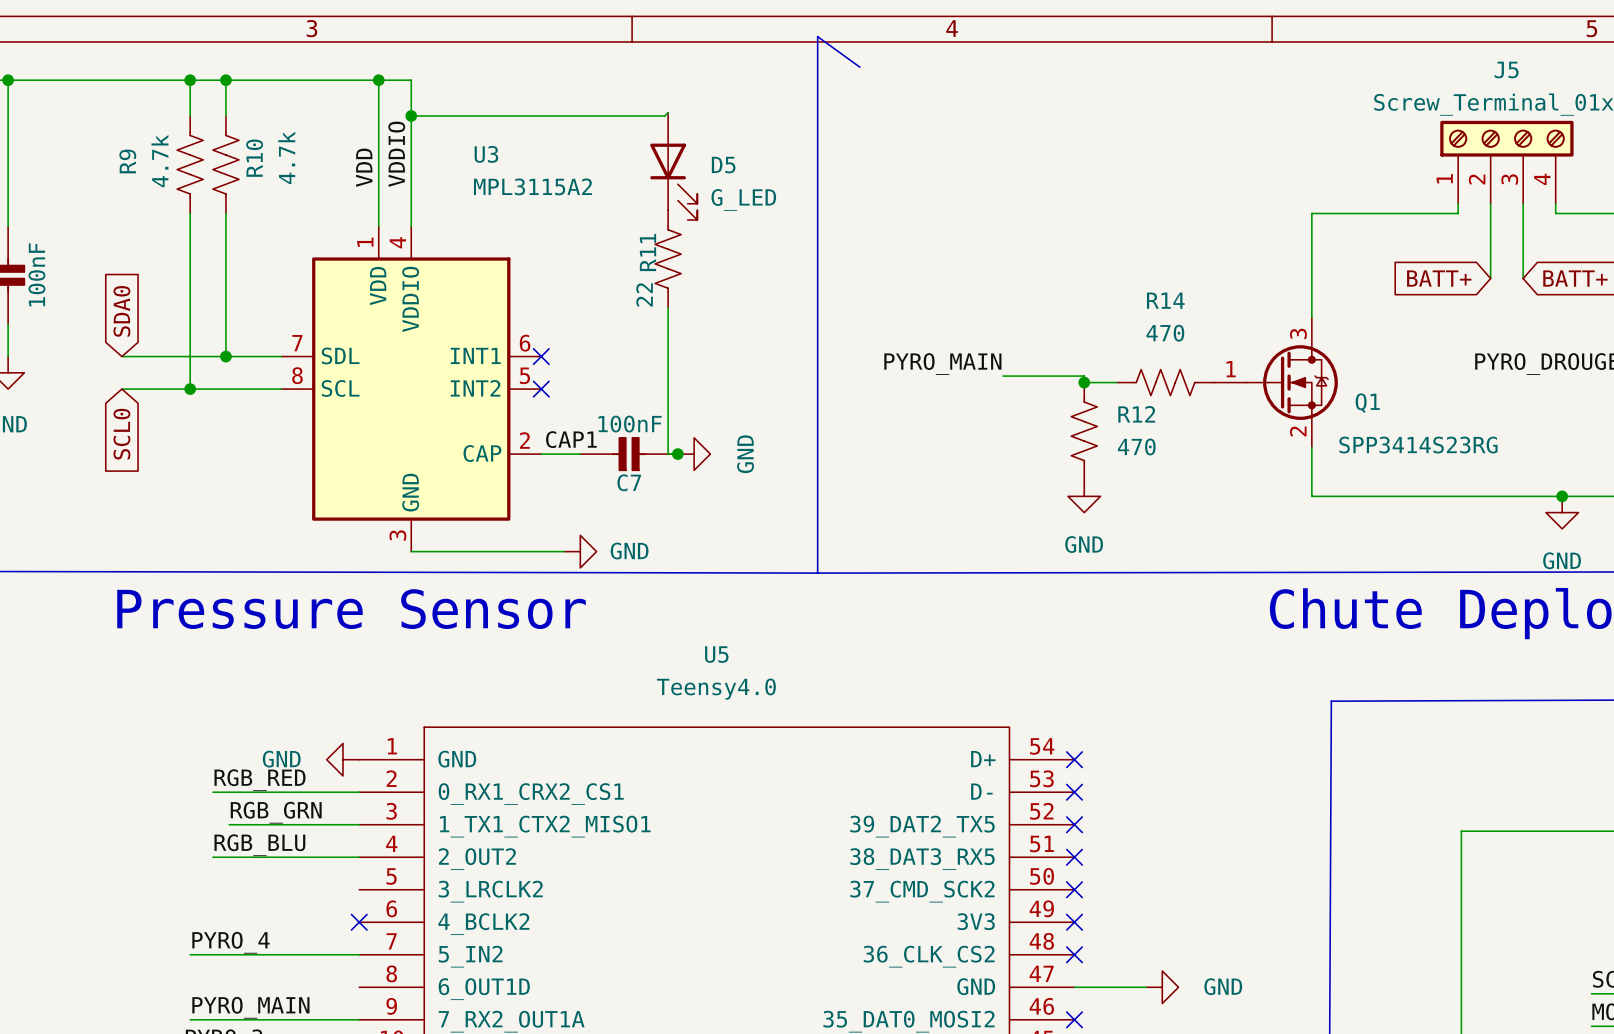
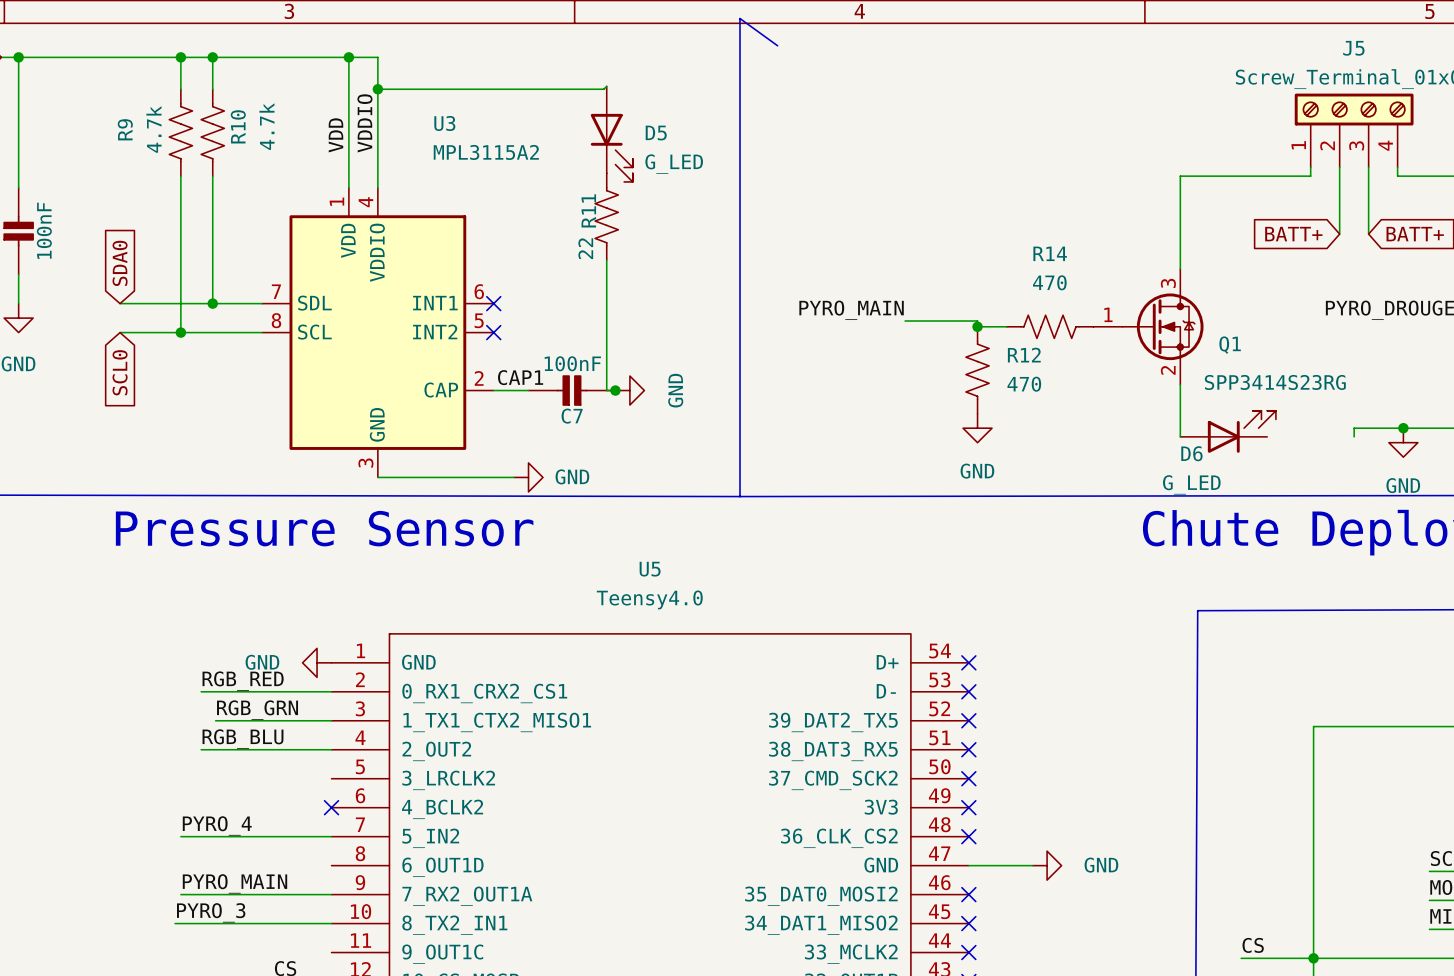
wire: (1311, 496) (1506, 496) -> (1180, 428) (1180, 436)
wire: none -> (1354, 428) (1354, 436)
D6: none -> G_LED (1228, 431)

